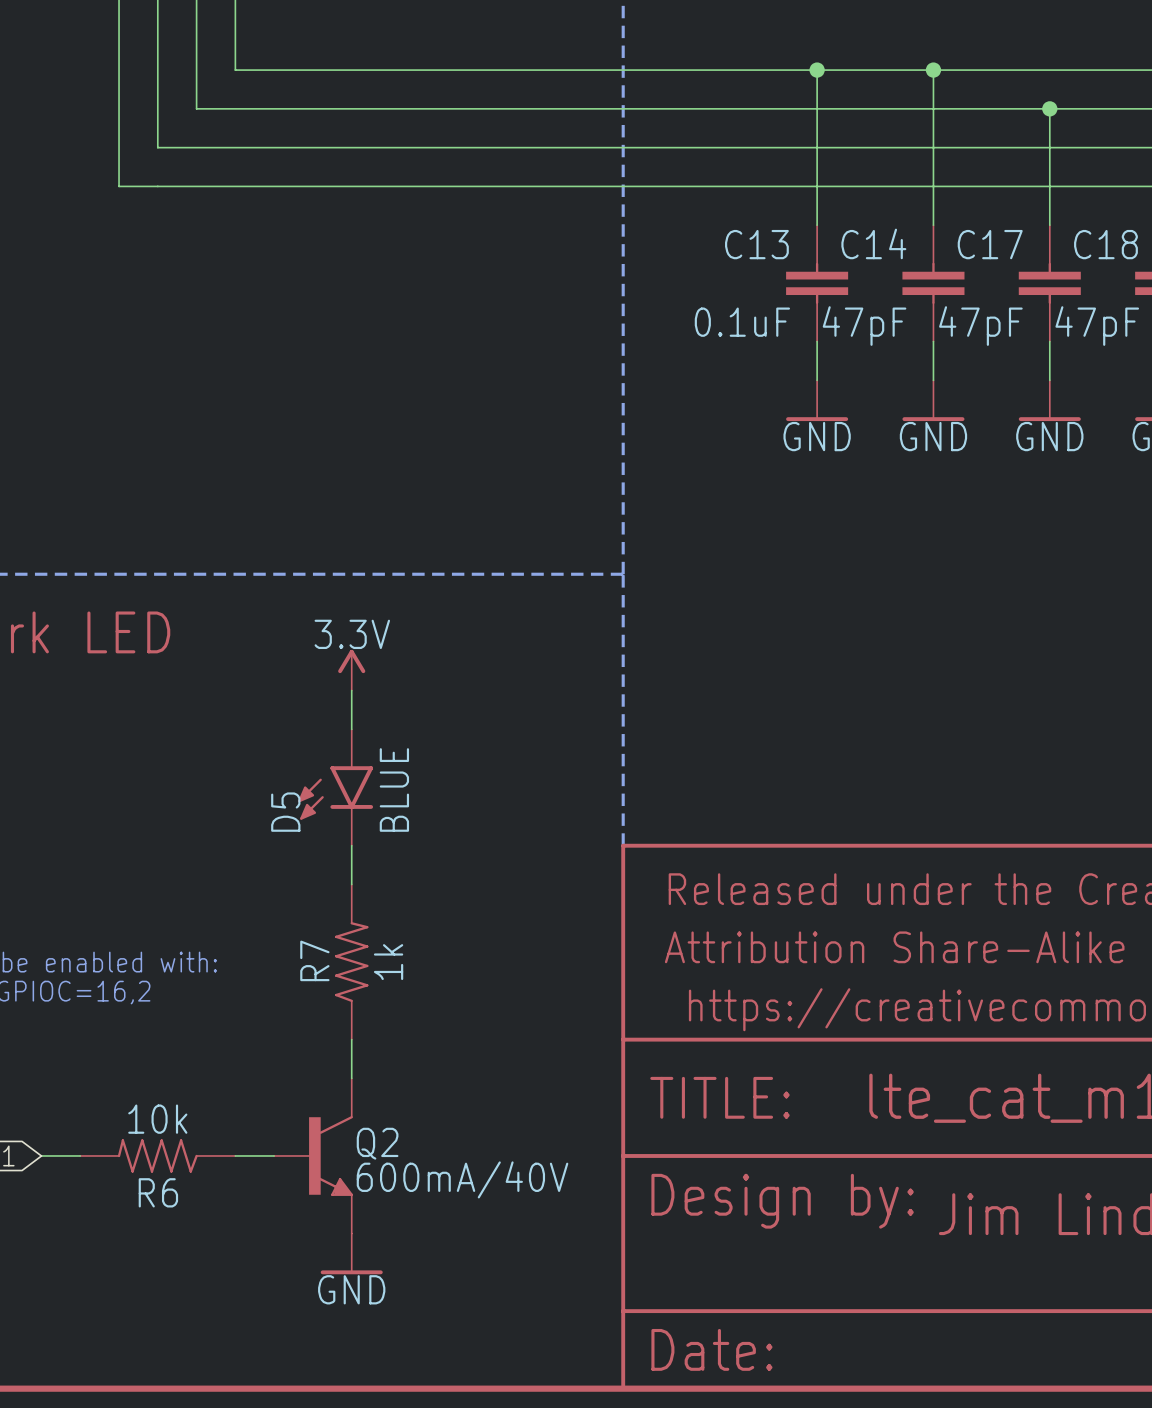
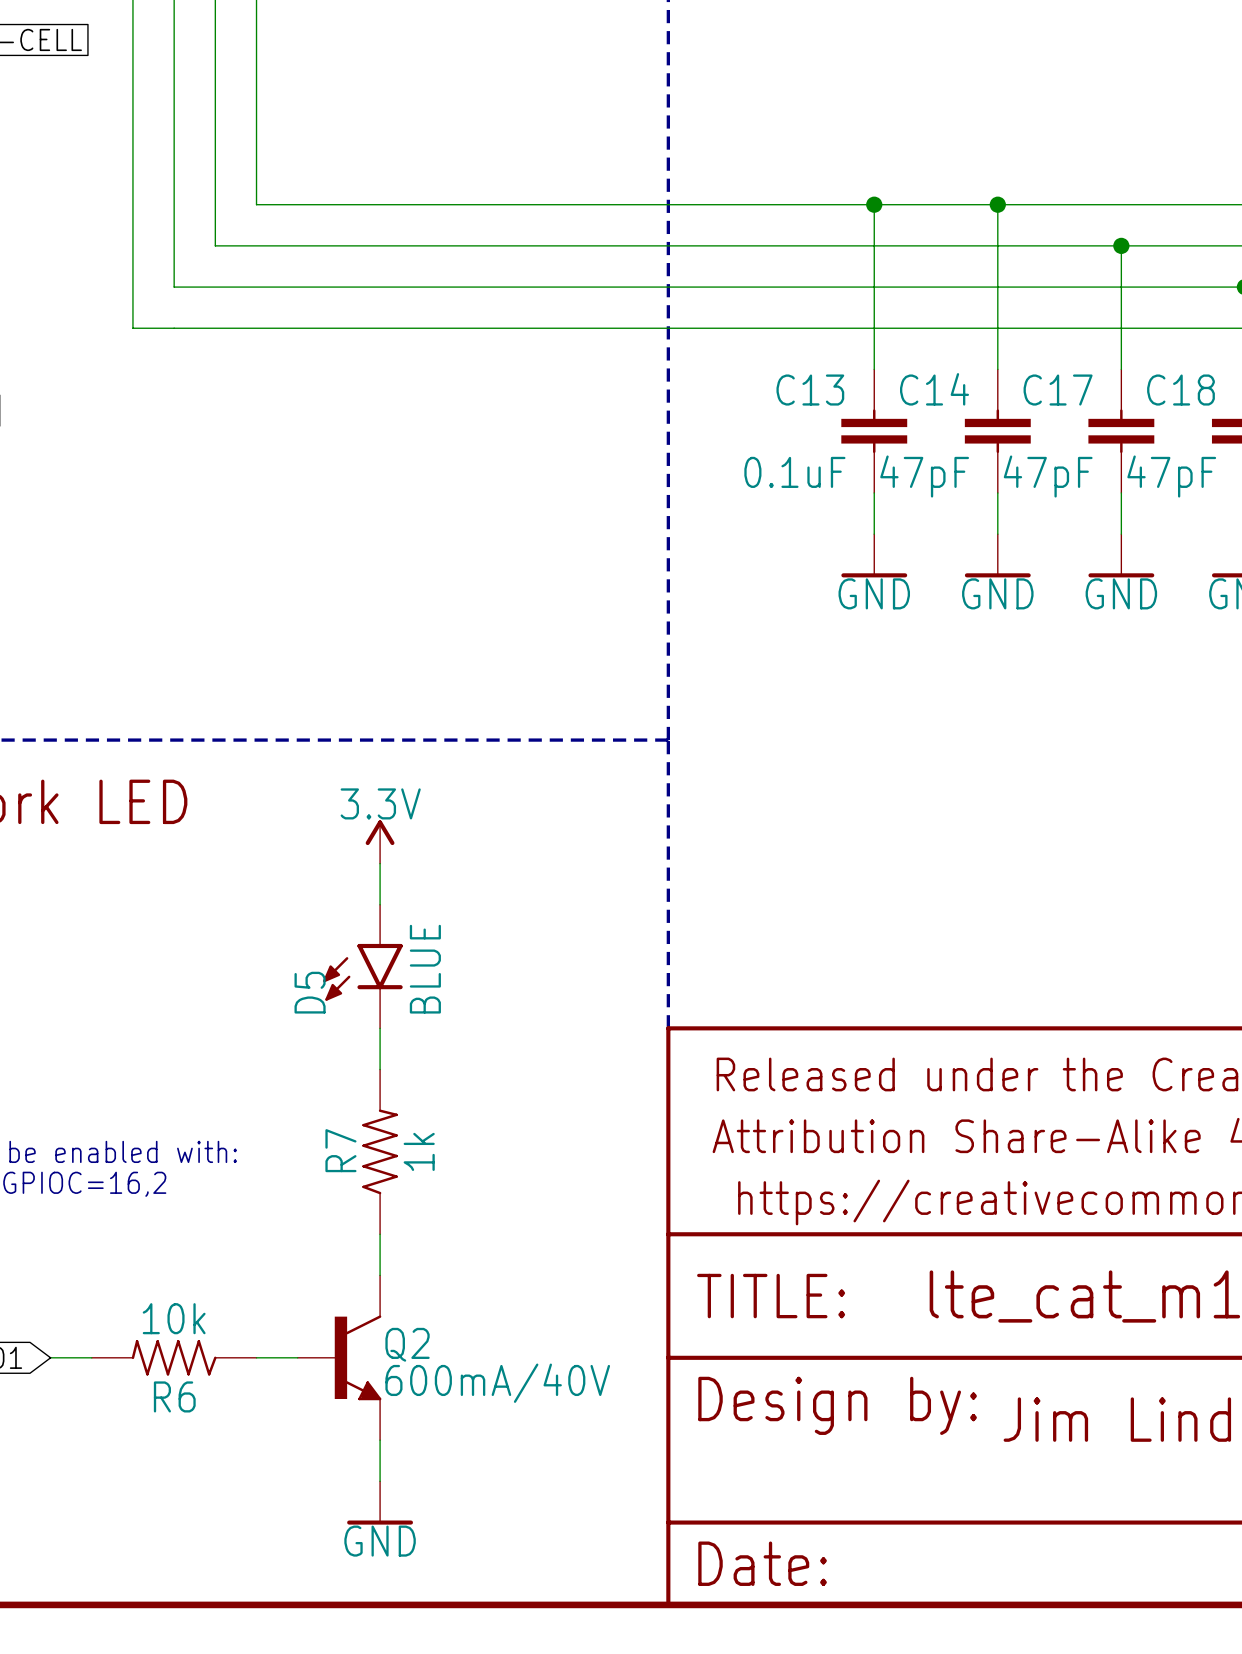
power symbol position: GND (351, 1253) -> GND (380, 1502)

